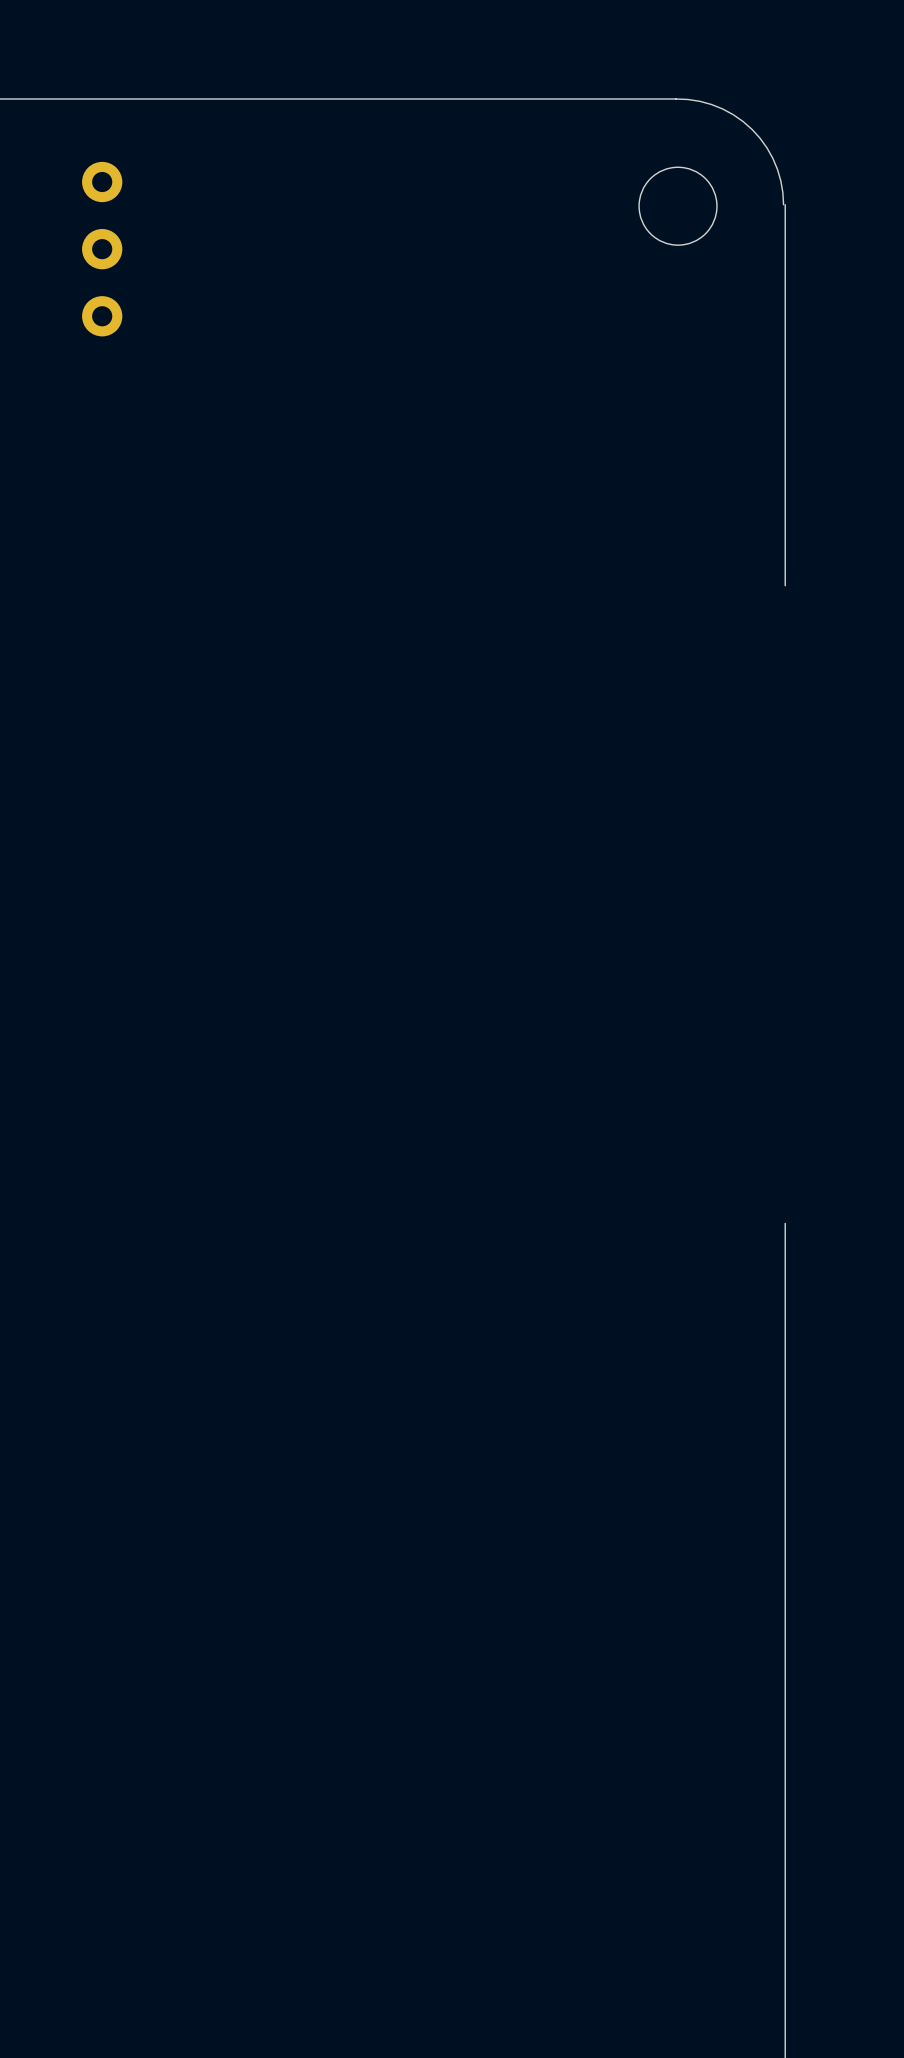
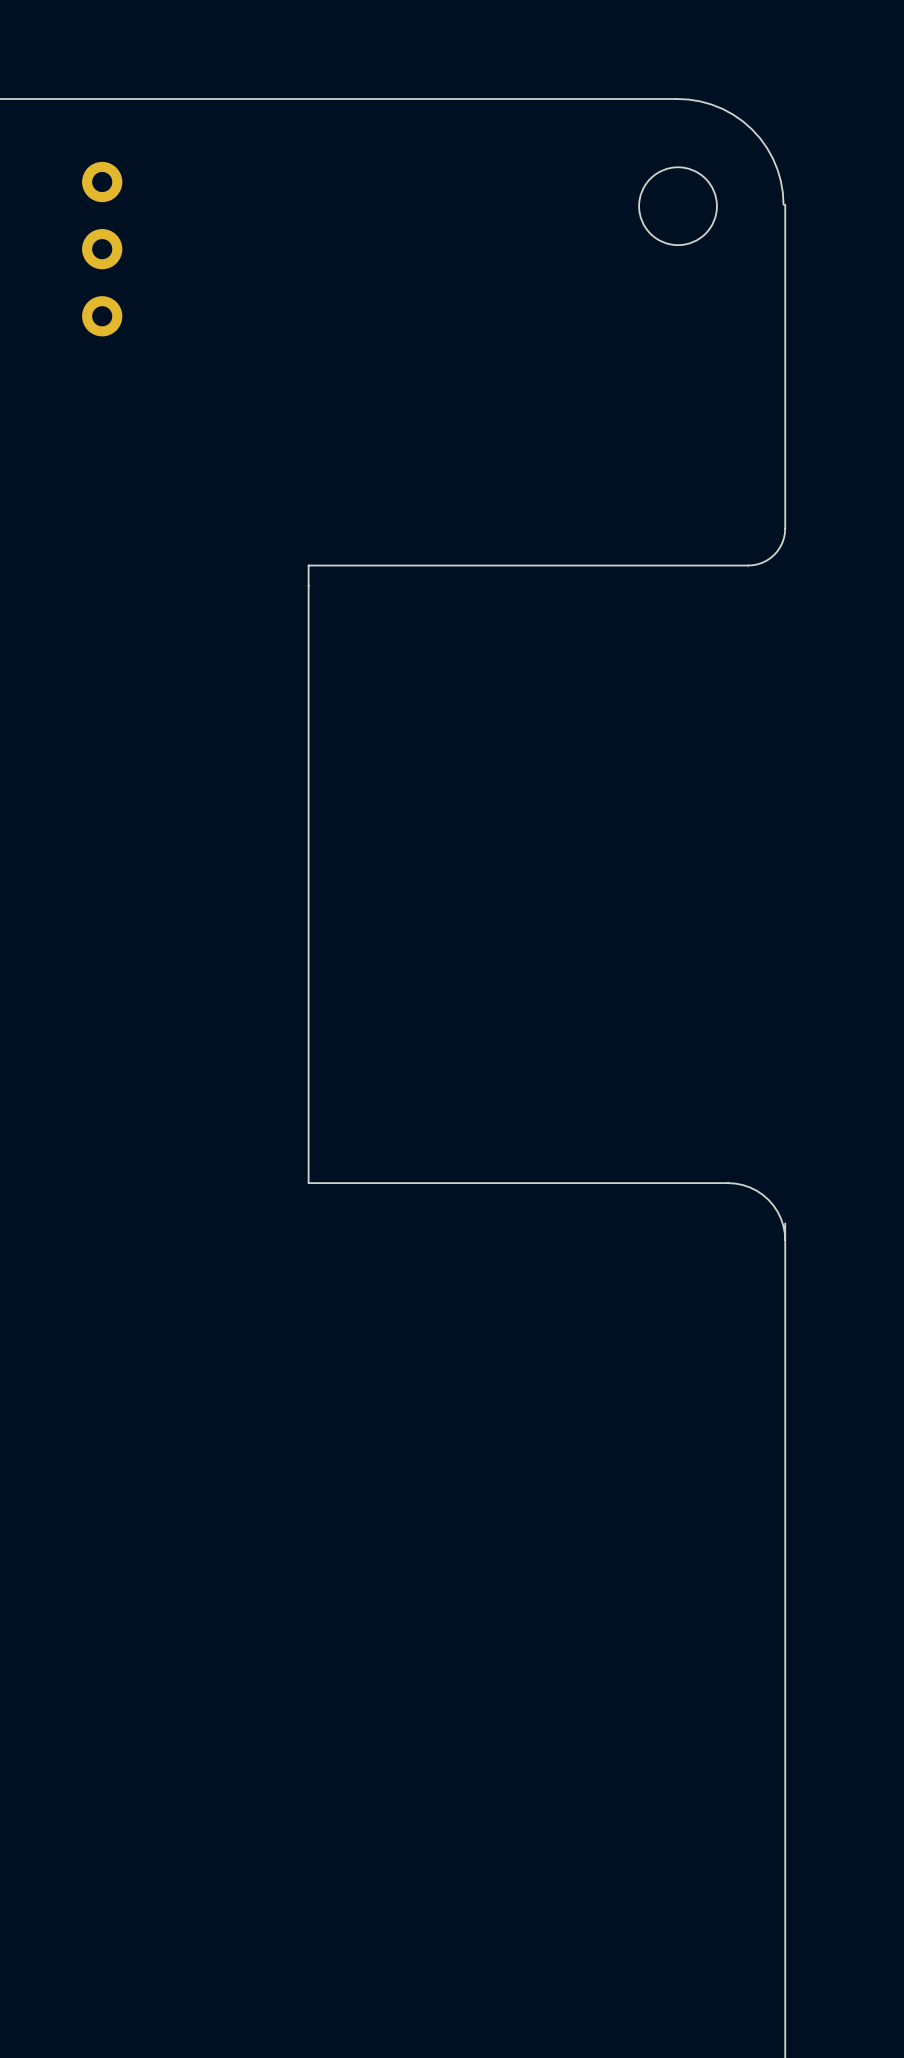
board edge: (785, 528) (785, 585) -> (785, 528) (782, 542) (777, 551) (766, 560) (753, 565) (308, 565) (308, 1183) (735, 1183) (756, 1190) (773, 1205) (780, 1218) (785, 1240)

